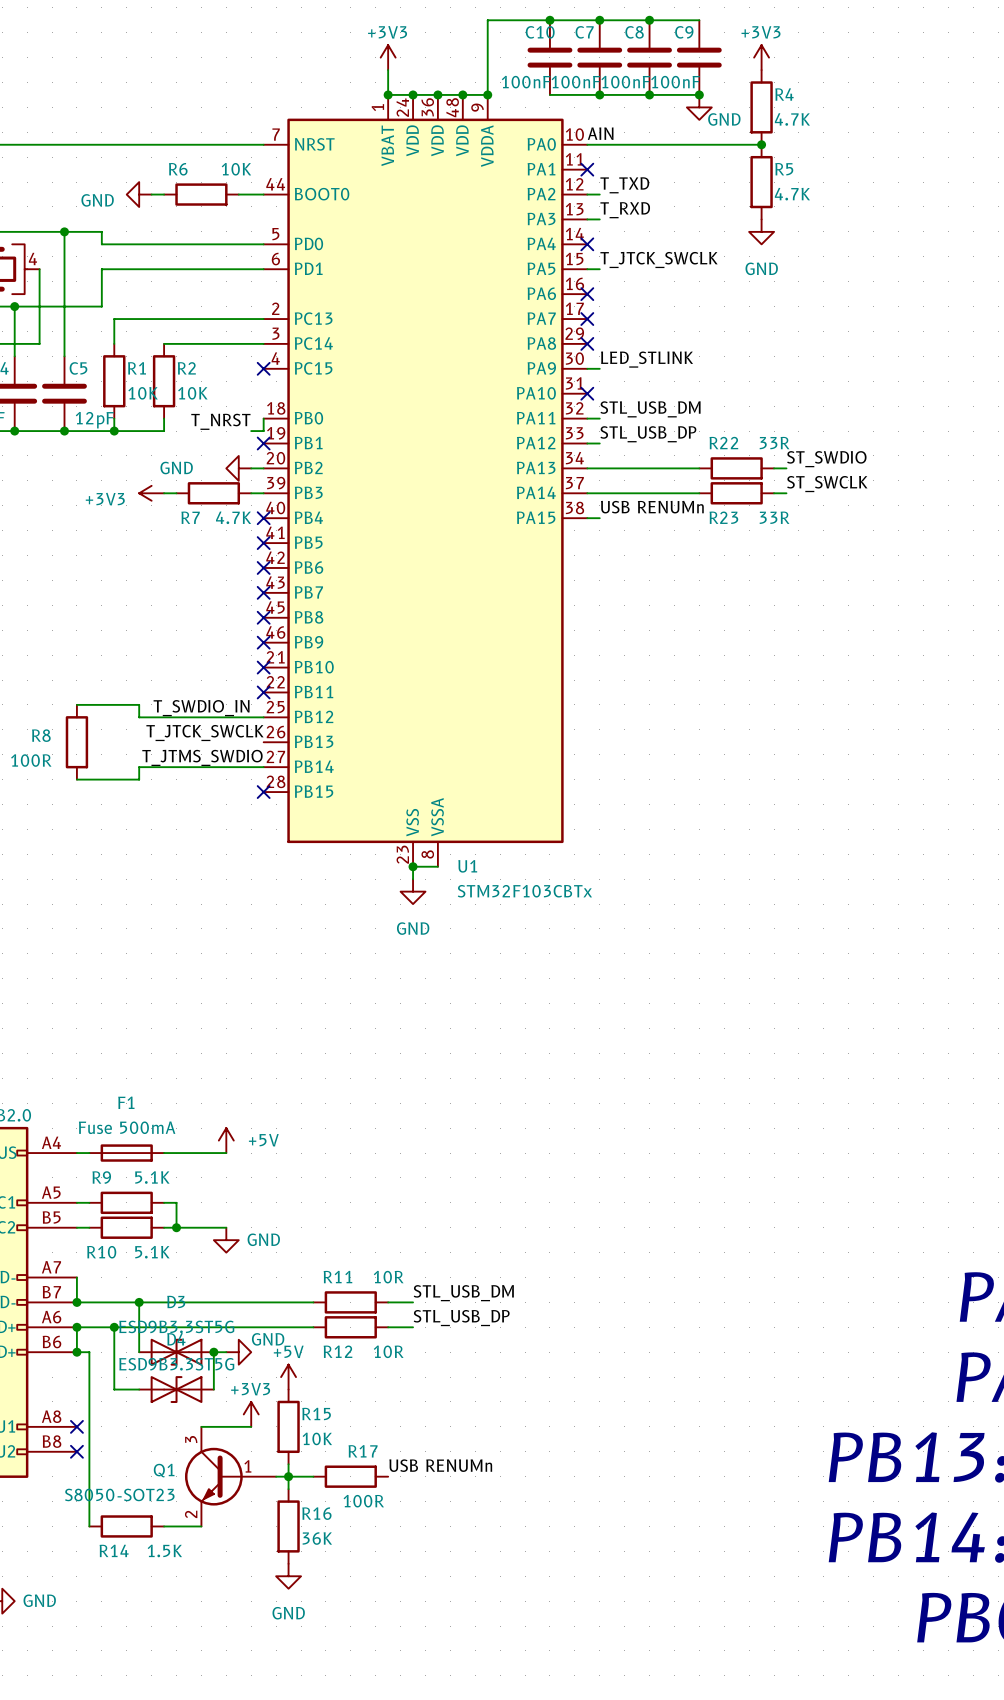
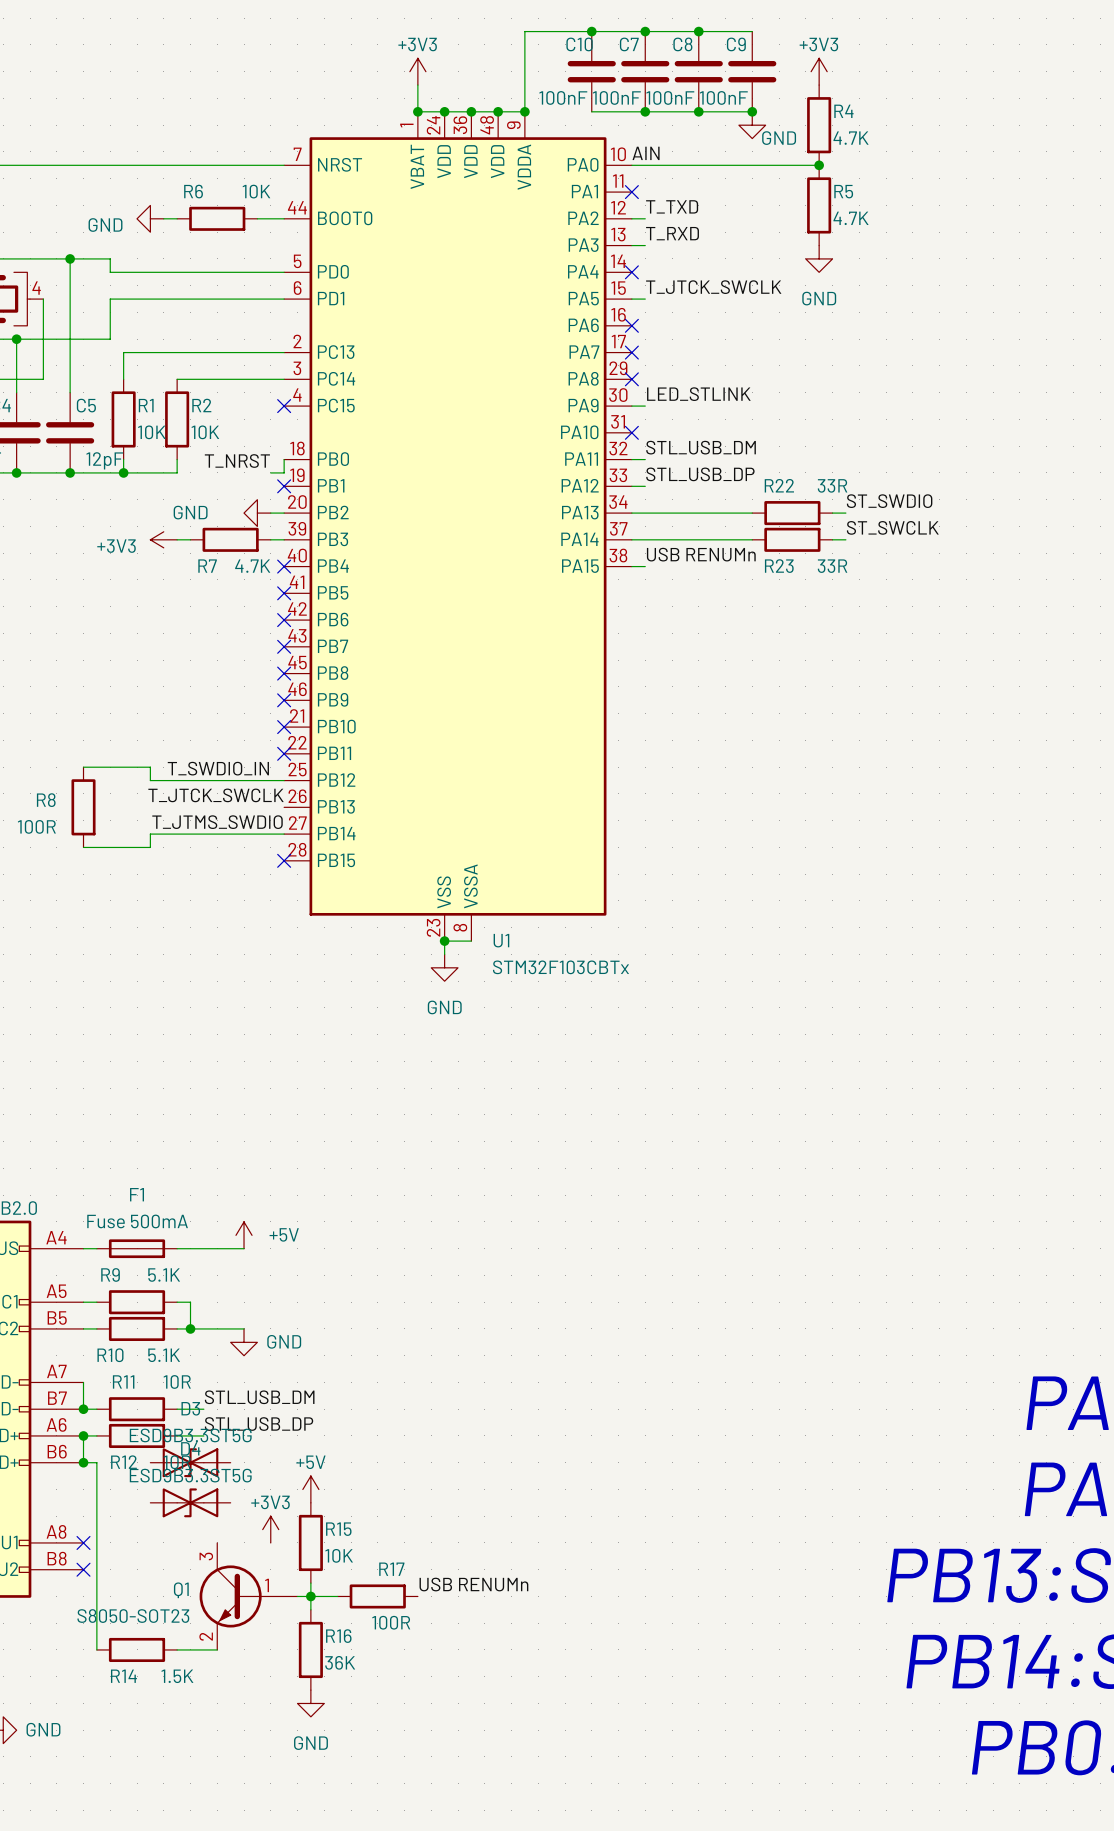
label position: STL_USB_DM (463, 1293) -> STL_USB_DM (259, 1397)
wire: (89, 1302) (164, 1302) -> none
wire: (139, 1302) (139, 1352) -> none
junction: (139, 1302) -> none
wire: (188, 1302) (313, 1302) -> none
R11 position: (350, 1302) -> (137, 1409)
wire: (388, 1302) (413, 1302) -> none
label position: STL_USB_DP (461, 1318) -> STL_USB_DP (259, 1424)
wire: (89, 1327) (164, 1327) -> none
wire: (114, 1327) (114, 1389) (139, 1389) -> none
junction: (114, 1327) -> none
wire: (188, 1327) (313, 1327) -> none
R12 position: (350, 1327) -> (137, 1435)
wire: (388, 1327) (413, 1327) -> none
junction: (213, 1352) -> none
wire: (226, 1352) (213, 1352) (213, 1389) -> none
power symbol: GND (238, 1352) -> none
wire: (201, 1426) (251, 1426) -> none

